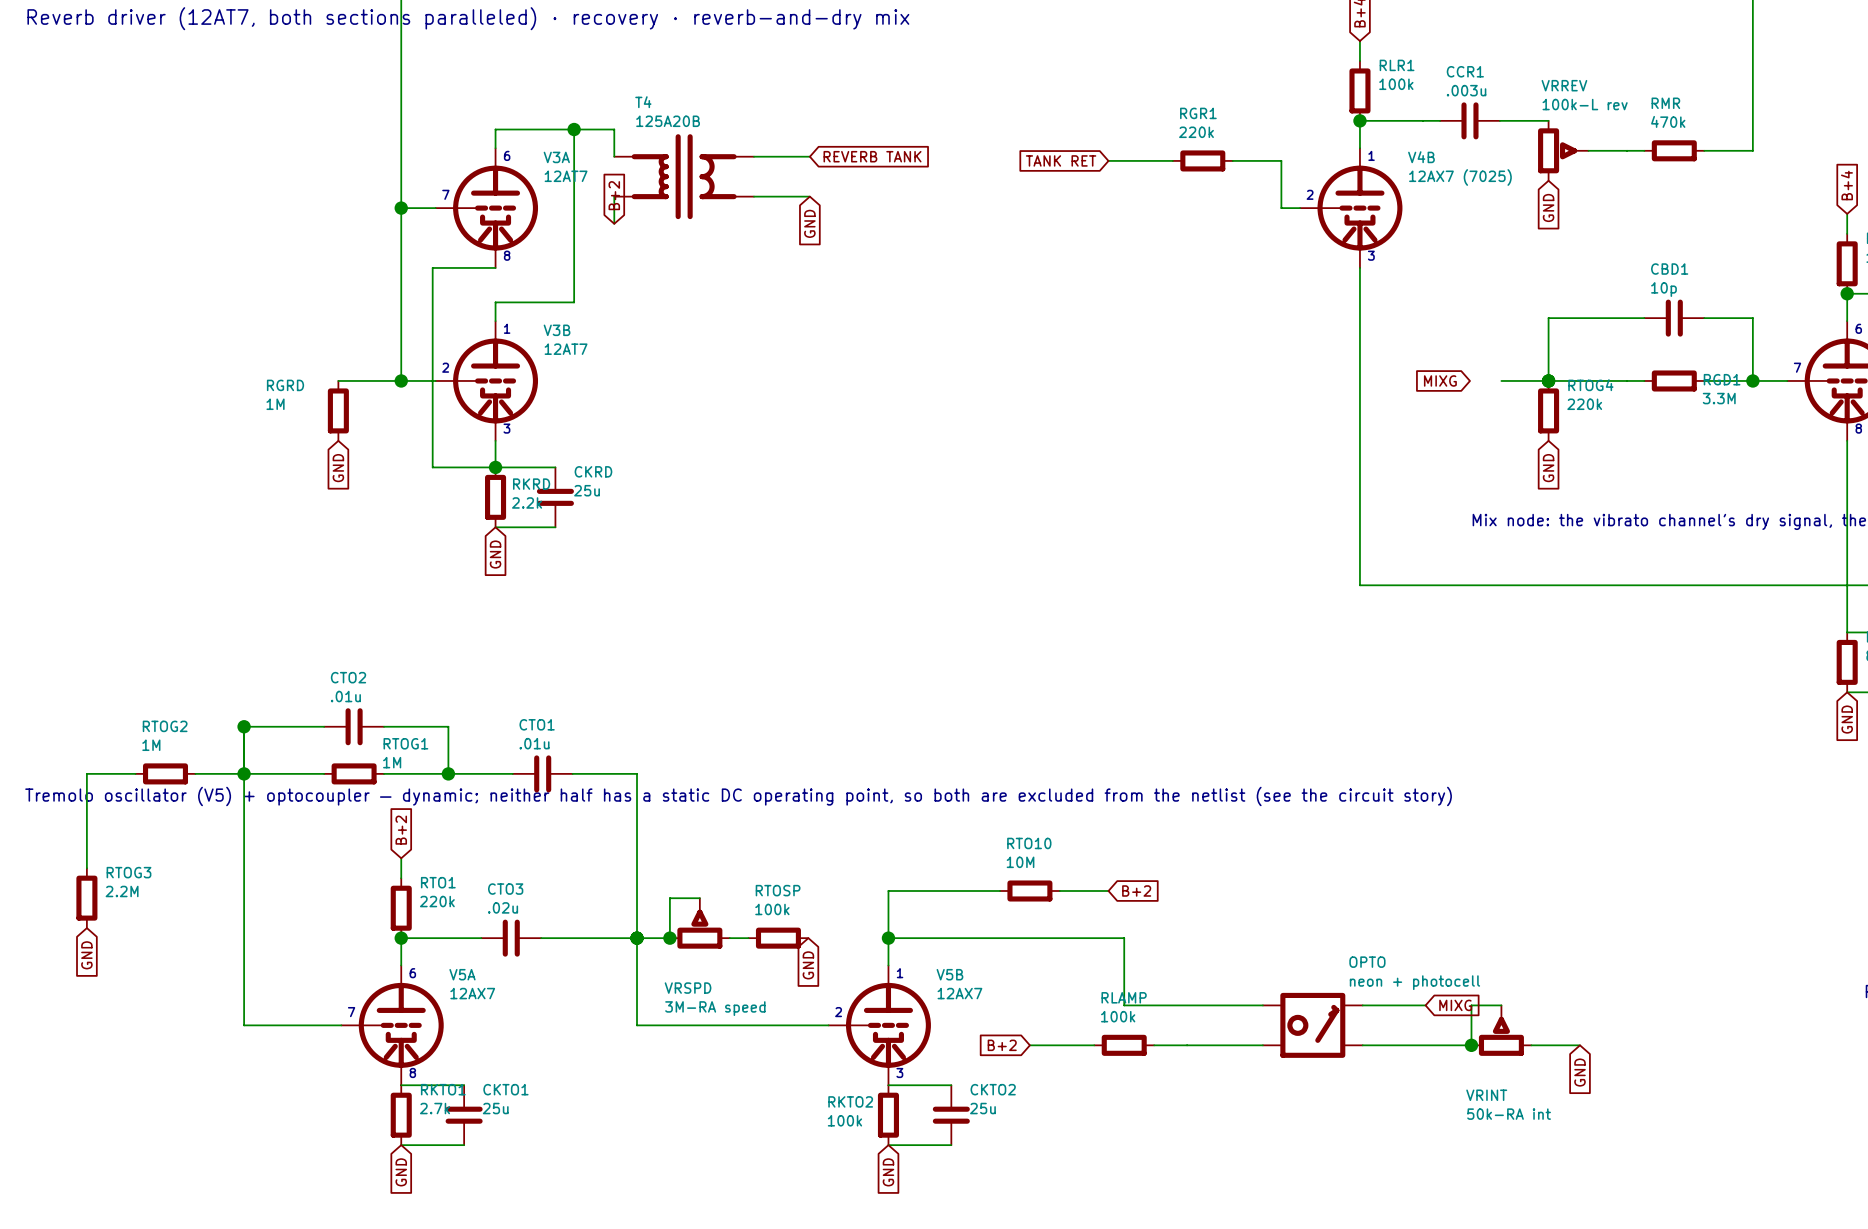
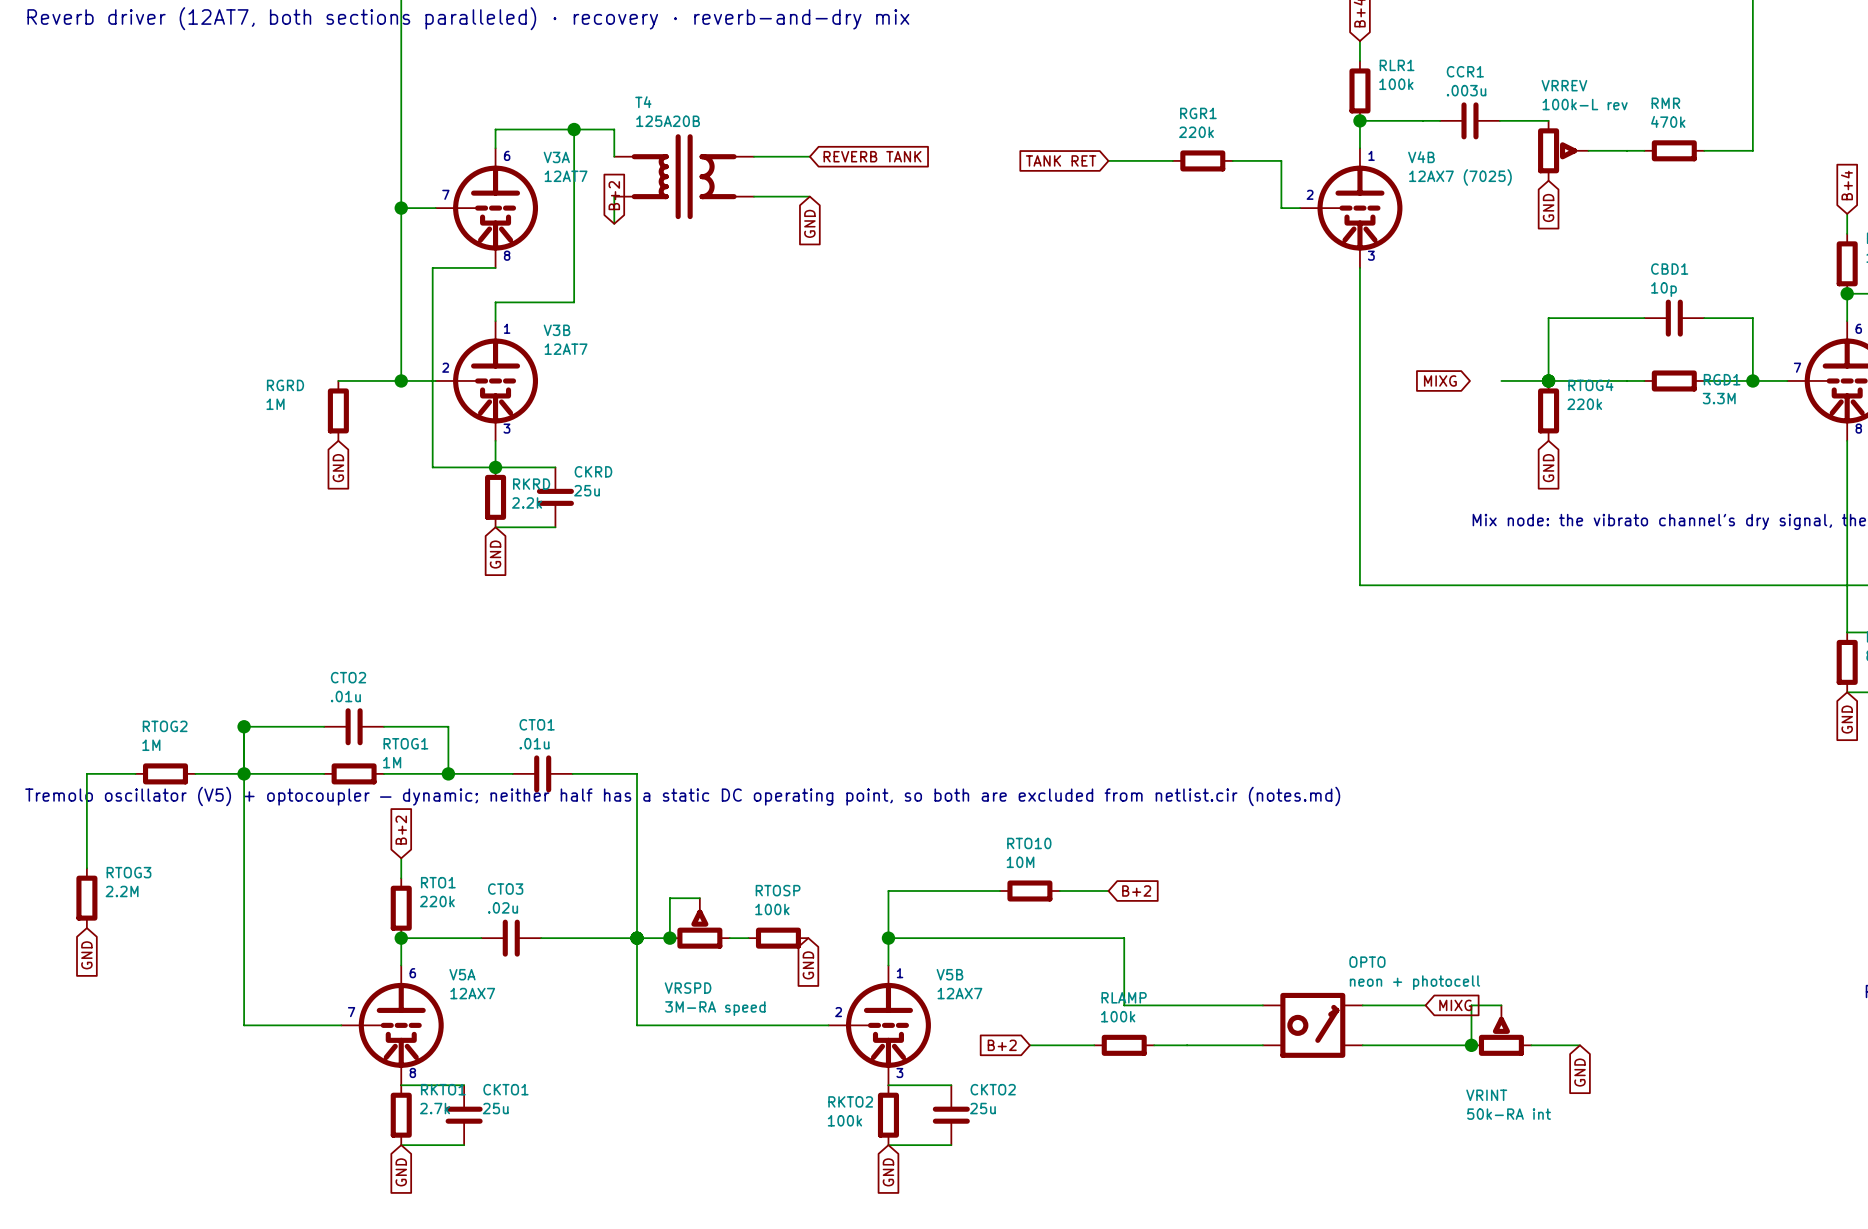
text: Tremolo oscillator (V5) + optocoupler — dynamic; neither half has a static DC operating point, so both are excluded from the netlist (see the circuit story) (738, 796) -> Tremolo oscillator (V5) + optocoupler — dynamic; neither half has a static DC operating point, so both are excluded from netlist.cir (notes.md) (682, 796)

